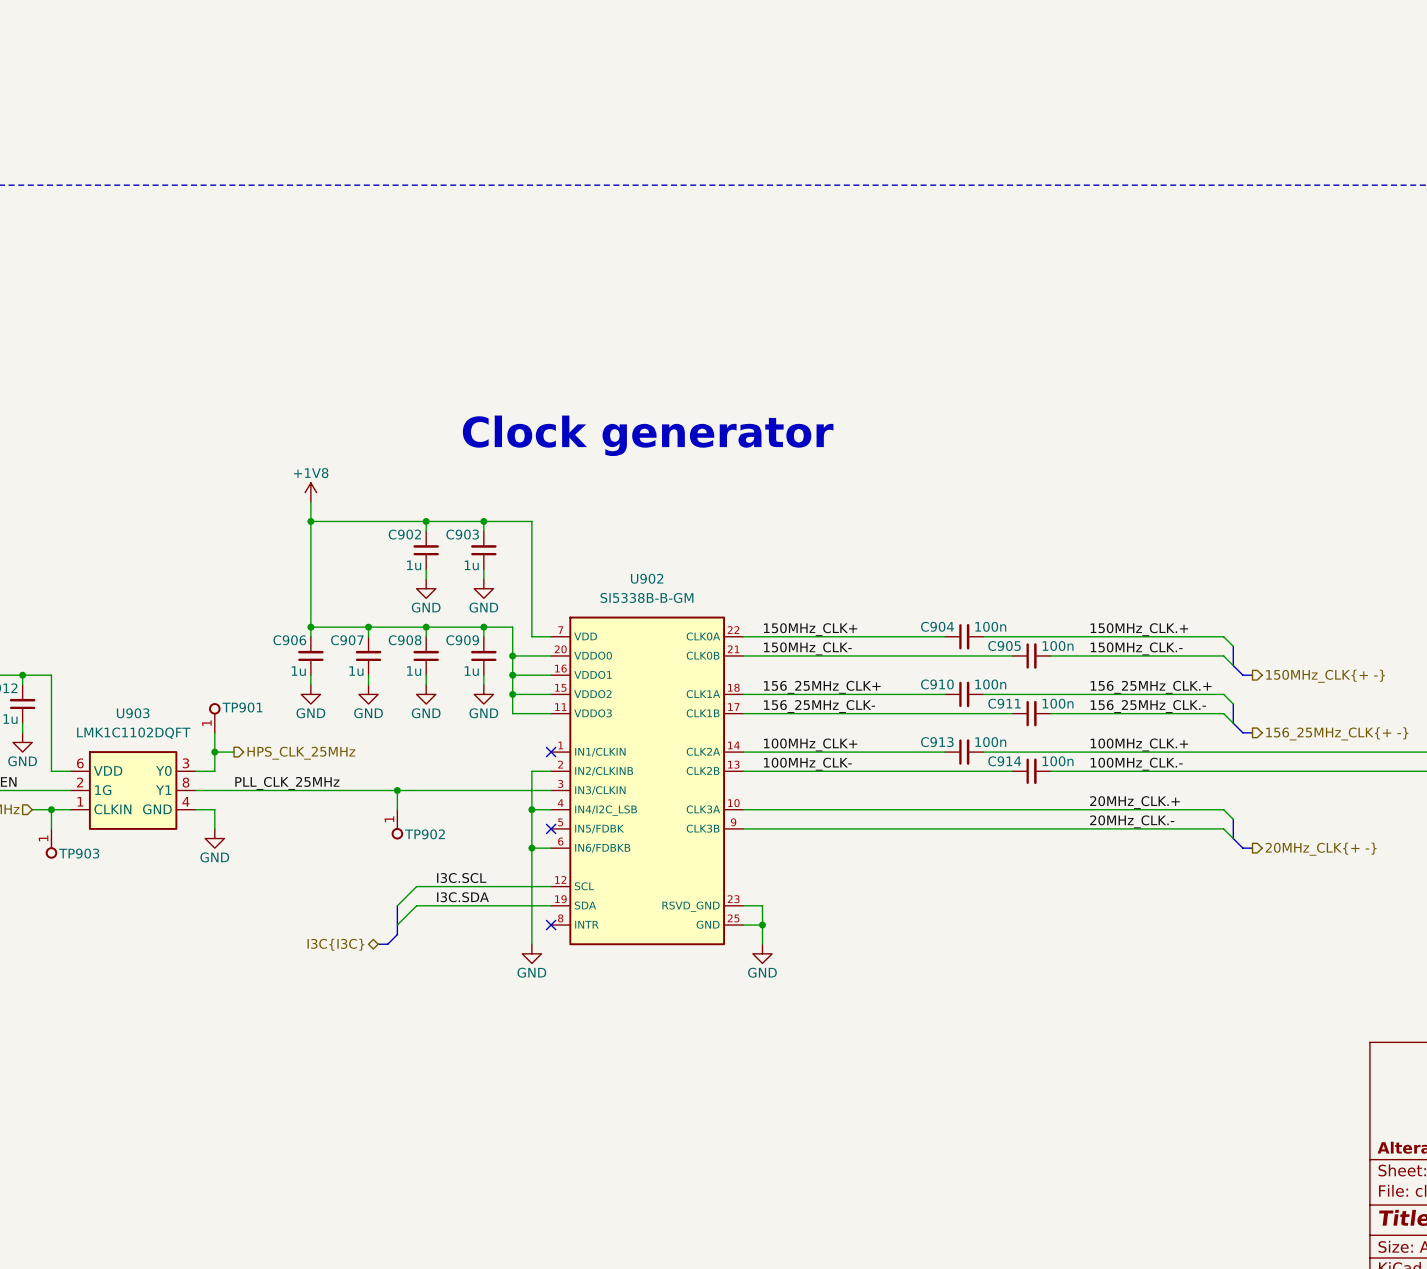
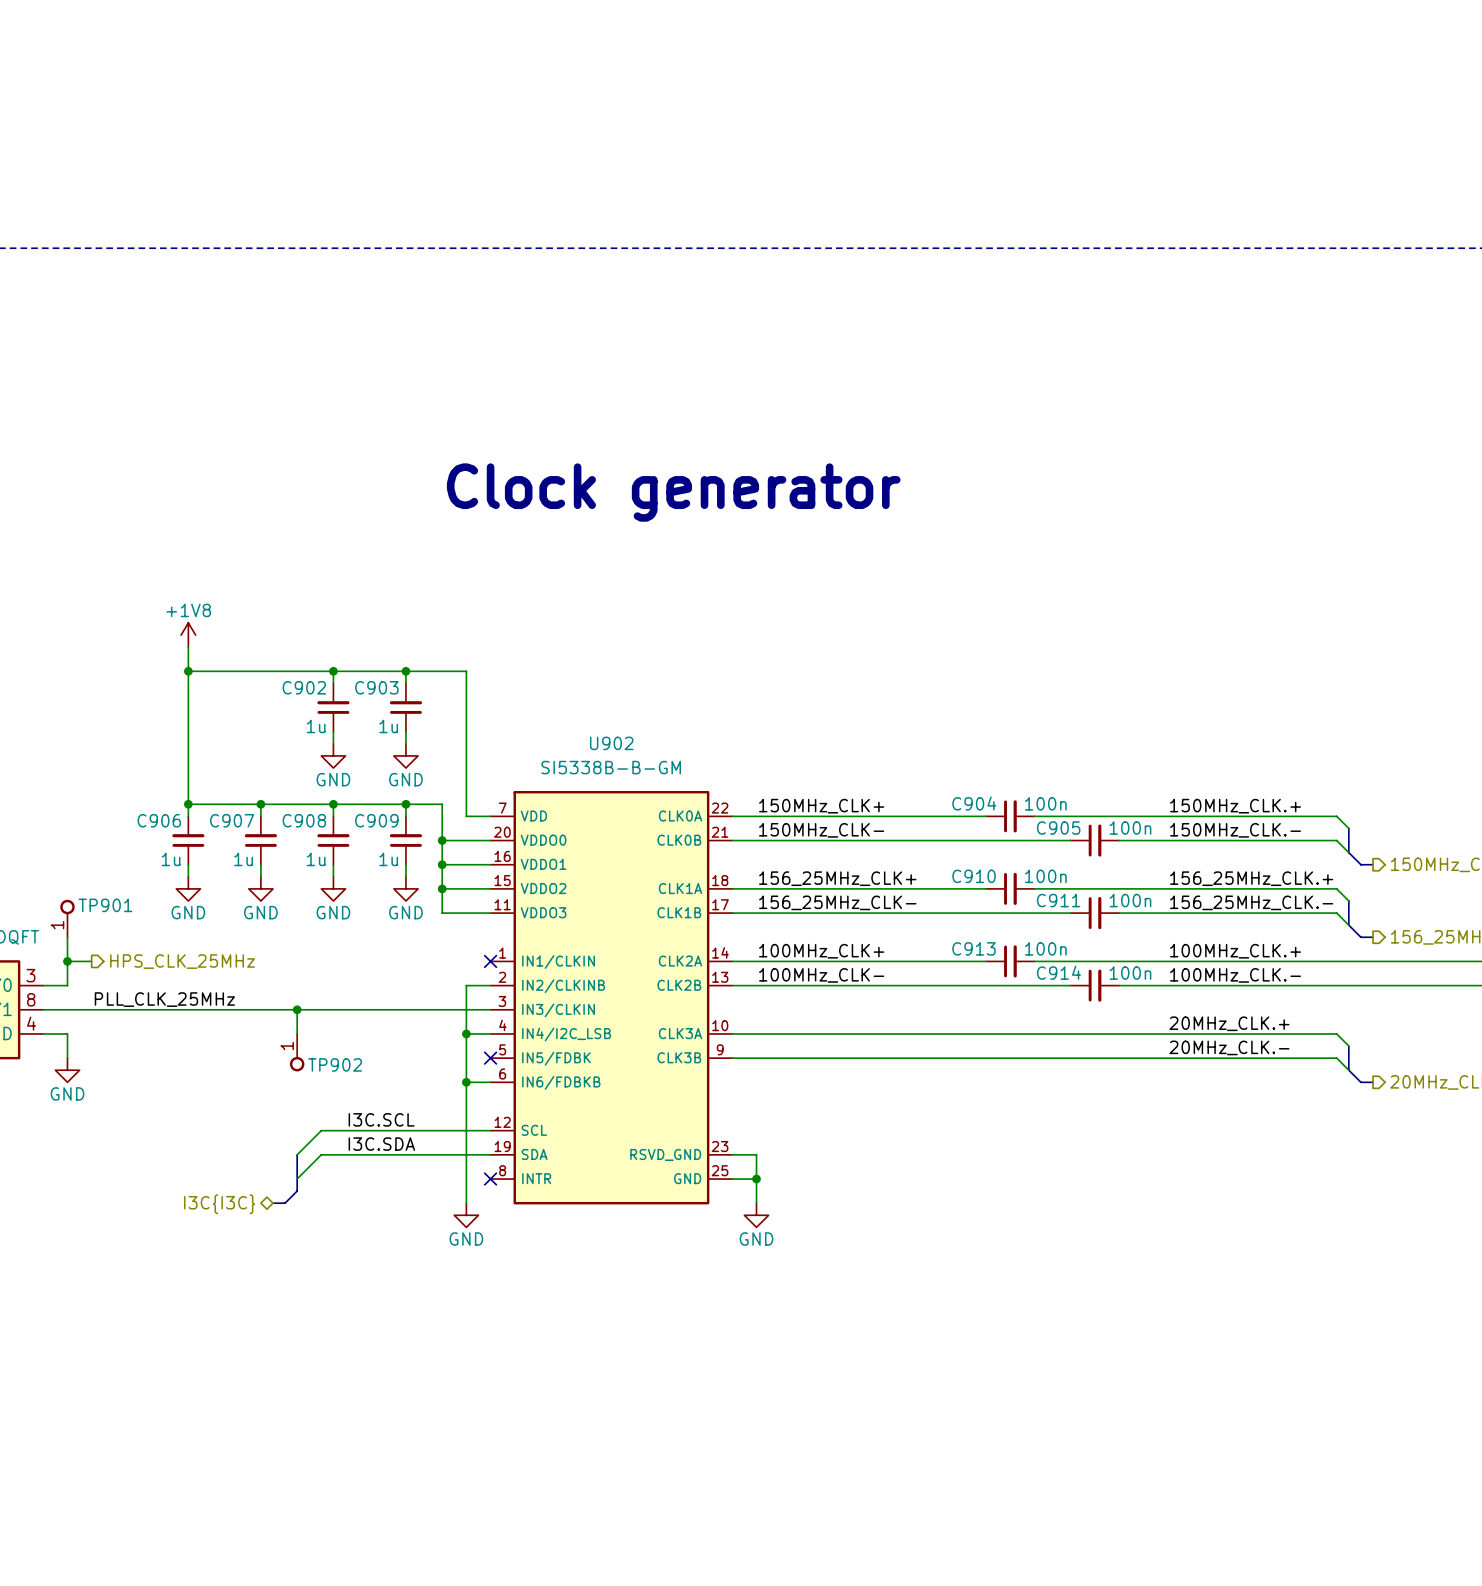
text position: Clock generator (648, 435) -> Clock generator (673, 492)

